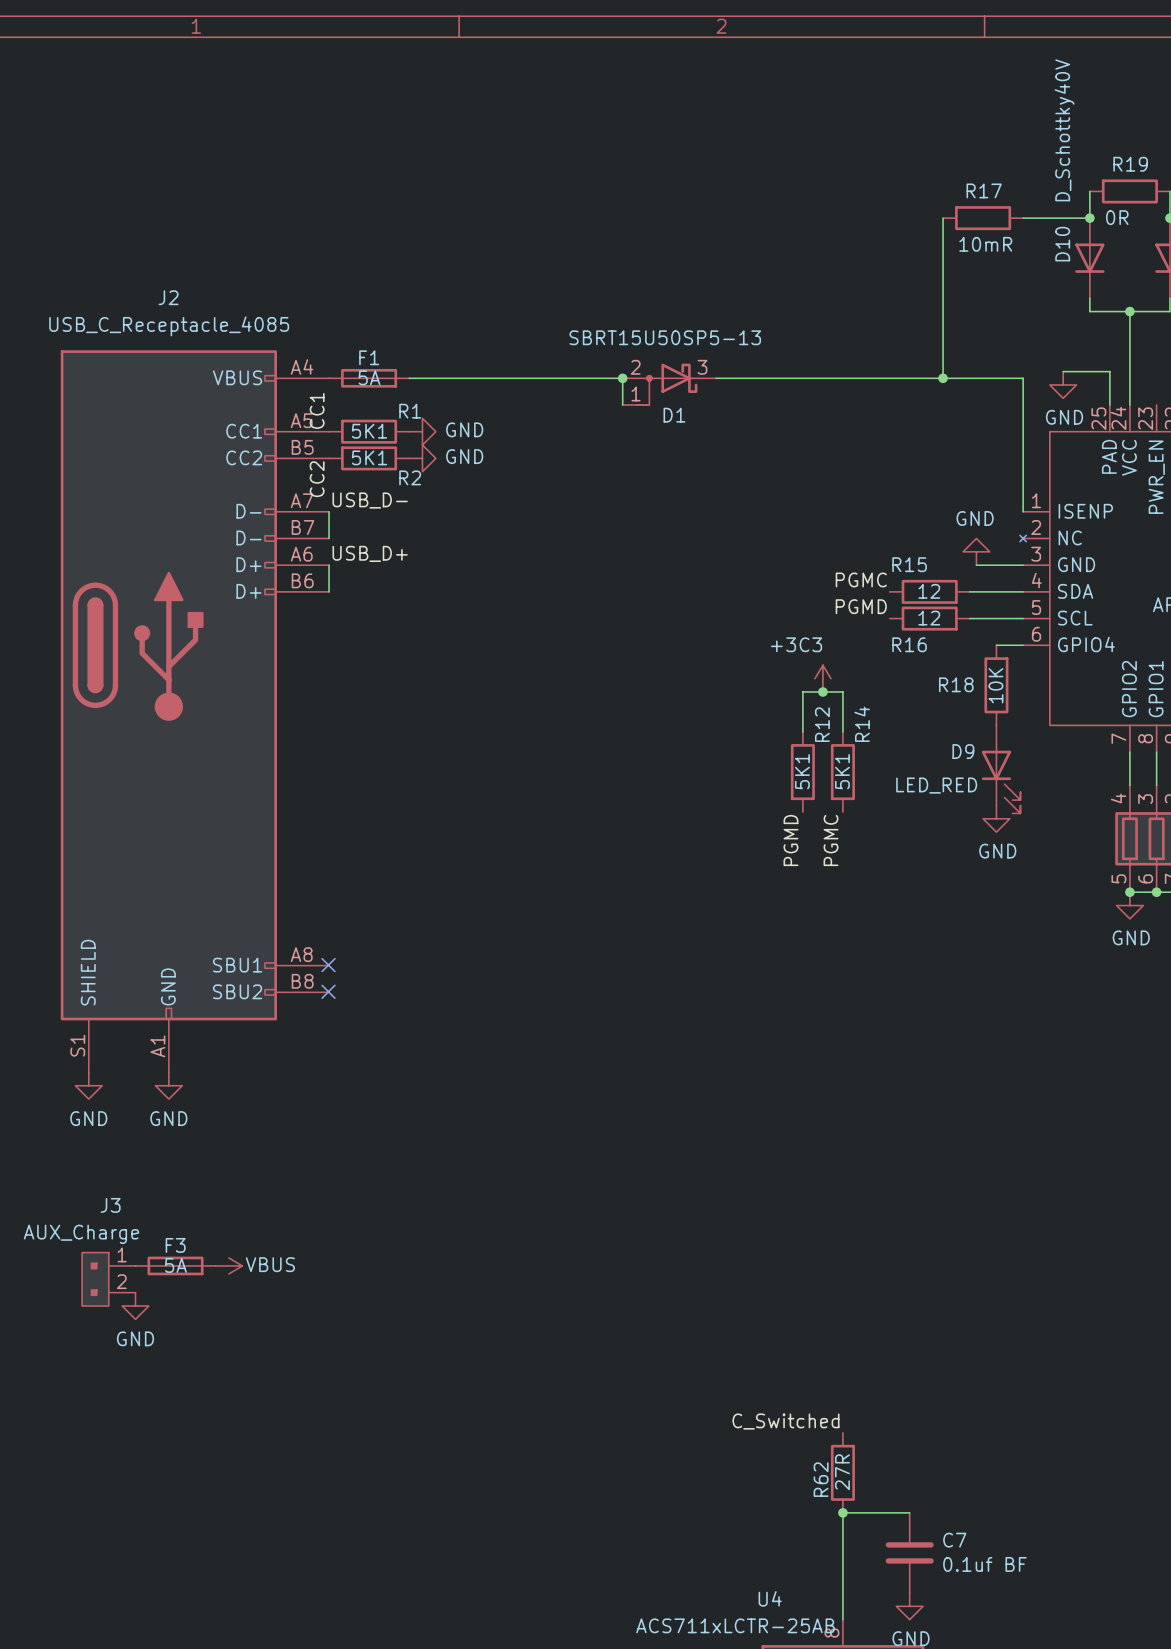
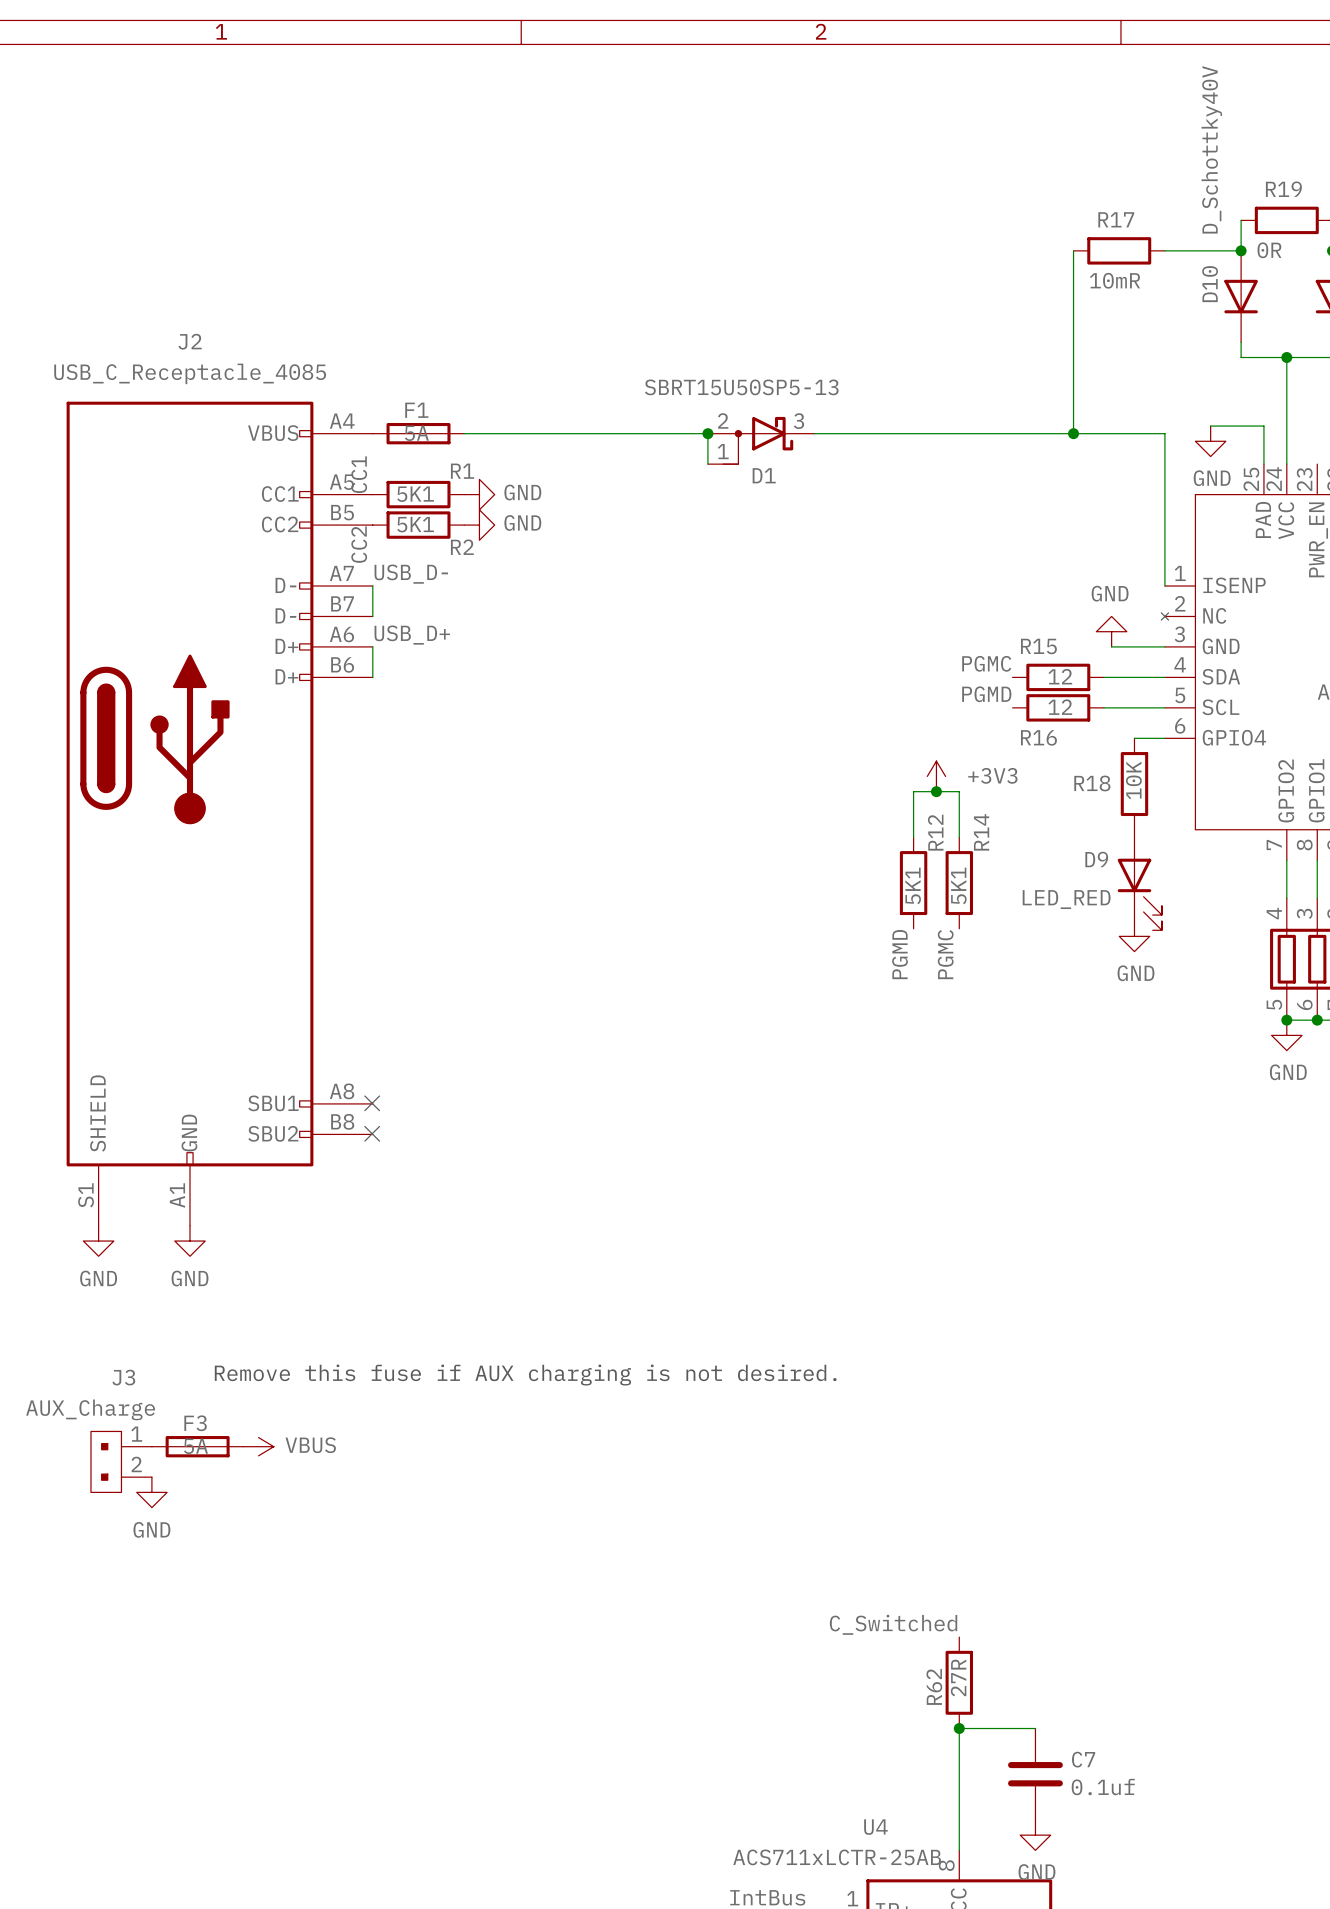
power symbol: +3C3 (822, 678) -> +3V3 (936, 776)
text: none -> Remove this fuse if AUX charging is not desired. (525, 1375)
C7 value: 0.1uf BF (984, 1564) -> 0.1uf (1103, 1787)

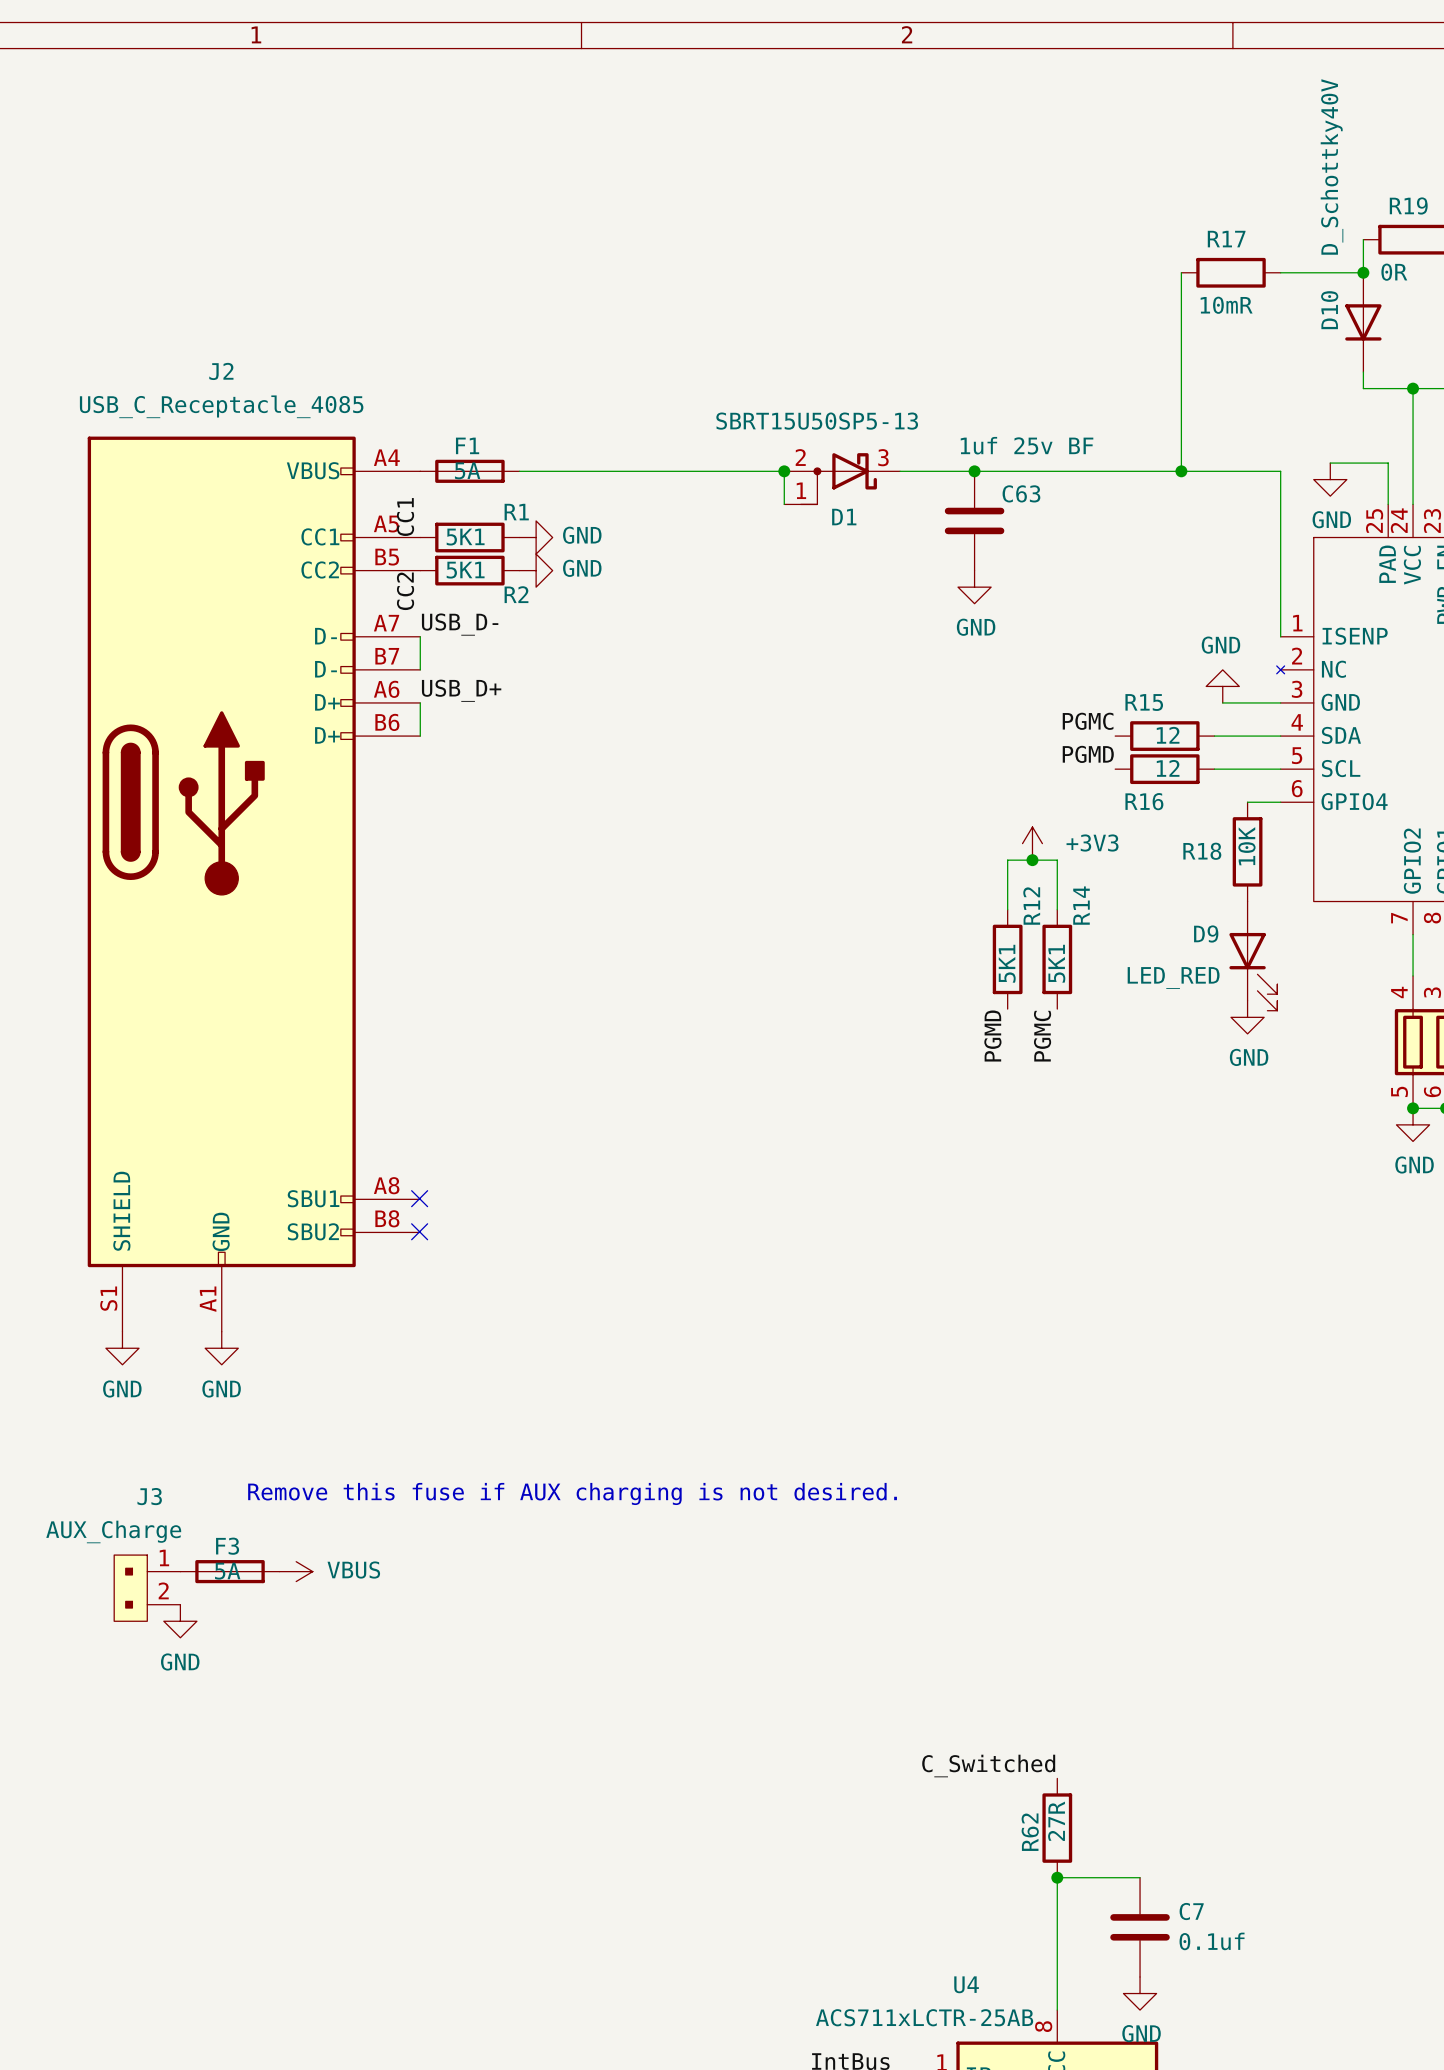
junction: none -> (974, 471)
C63: none -> 1uf 25v BF (974, 520)
power symbol: none -> GND (974, 587)

